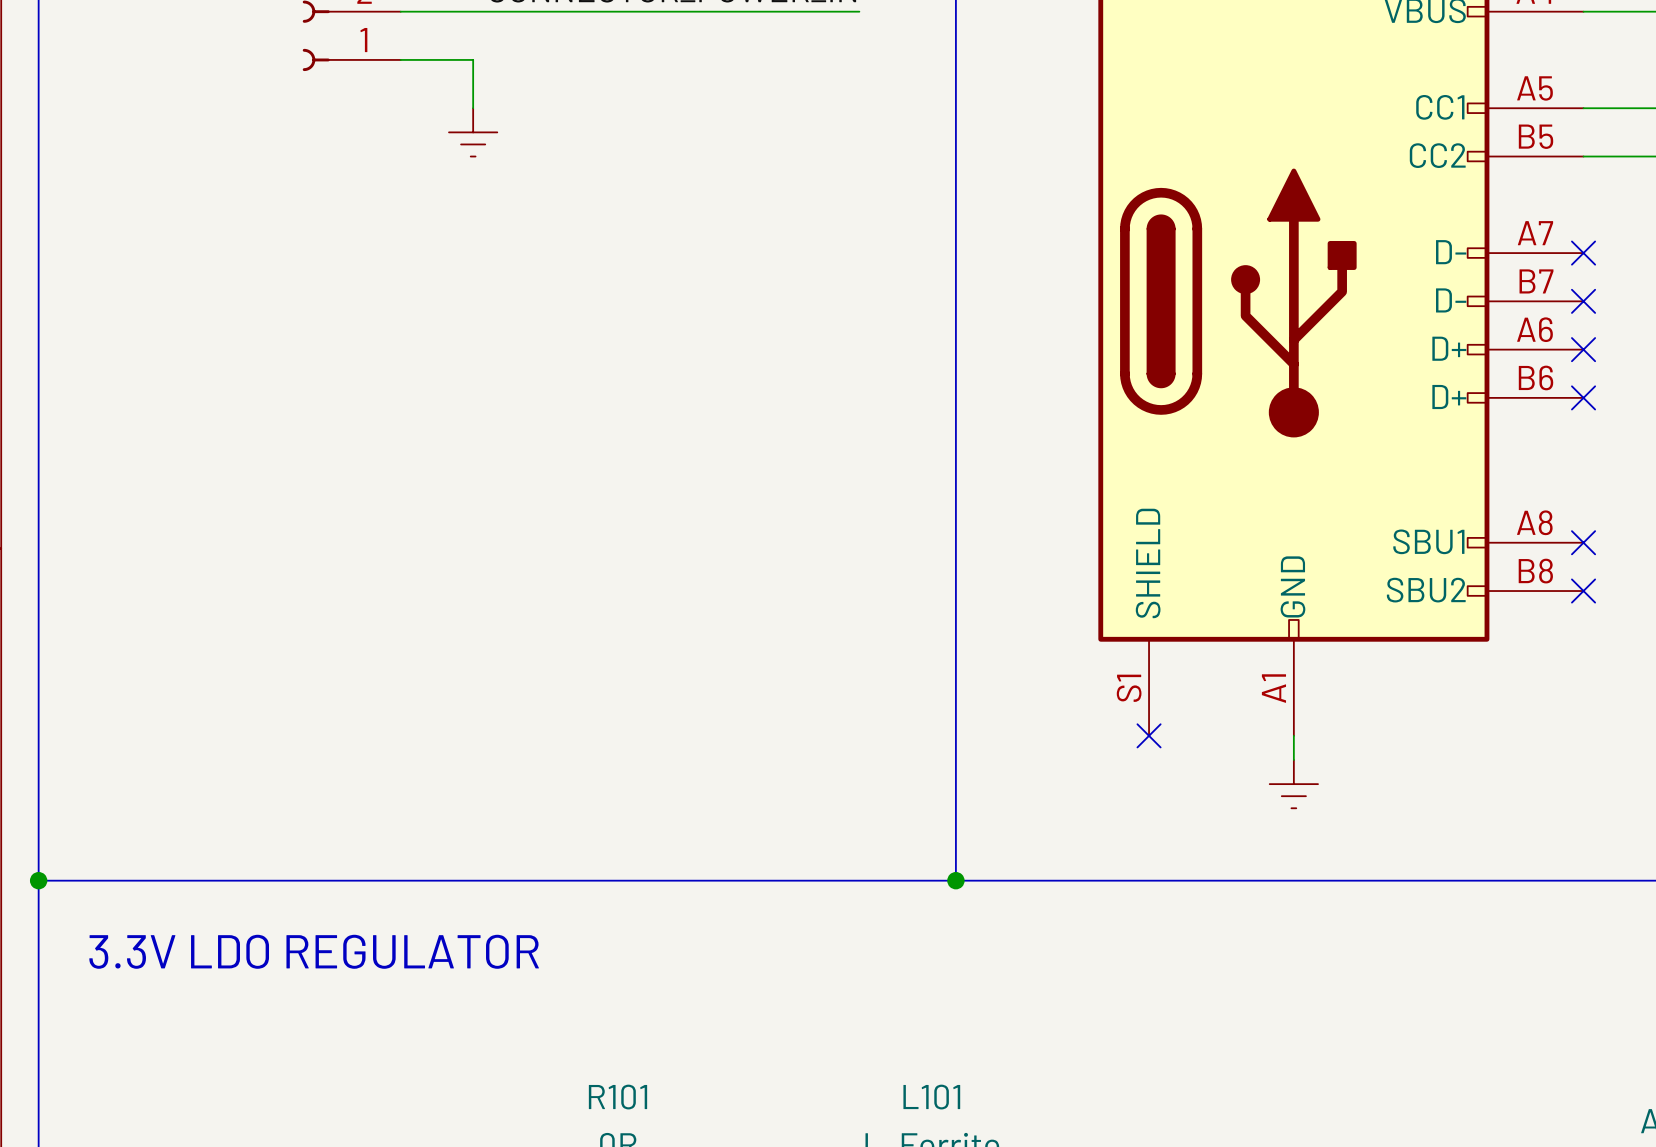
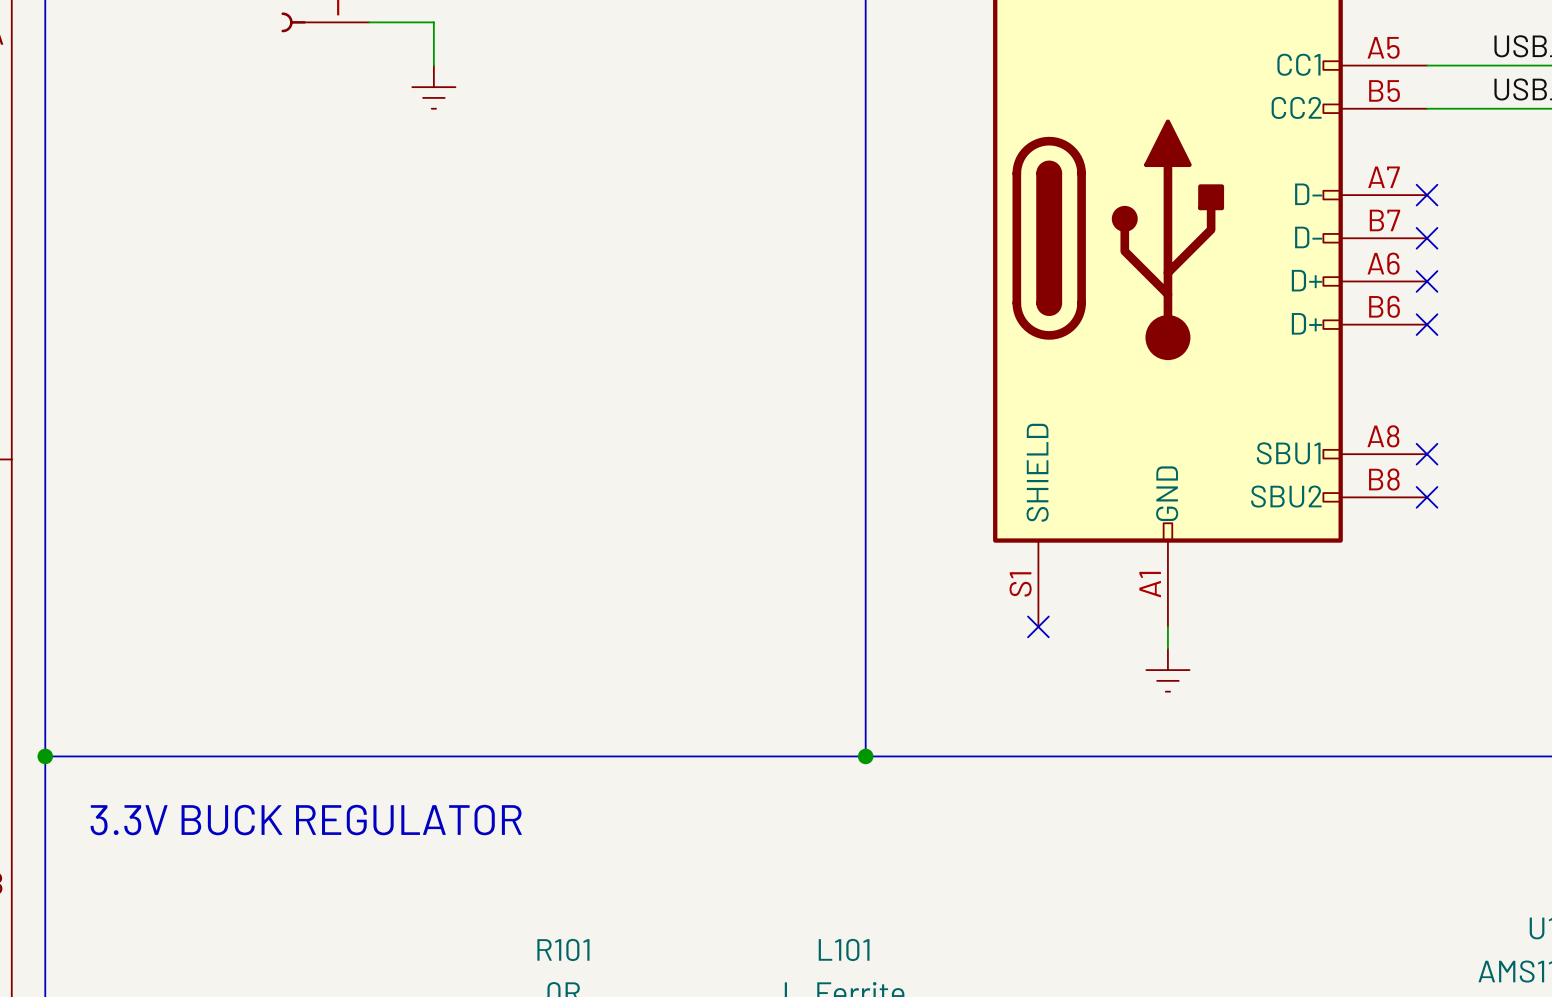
text: 3.3V LDO REGULATOR (314, 951) -> 3.3V BUCK REGULATOR (306, 820)

